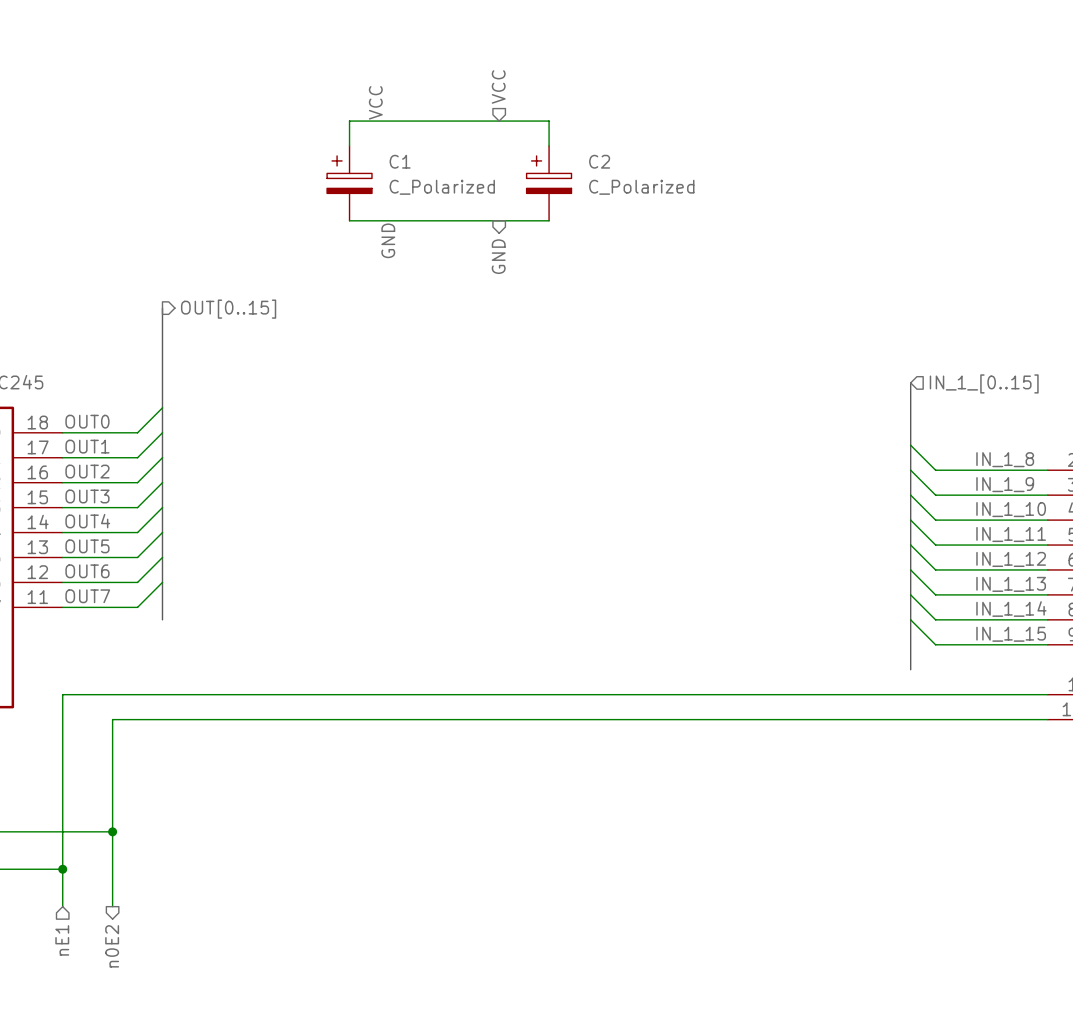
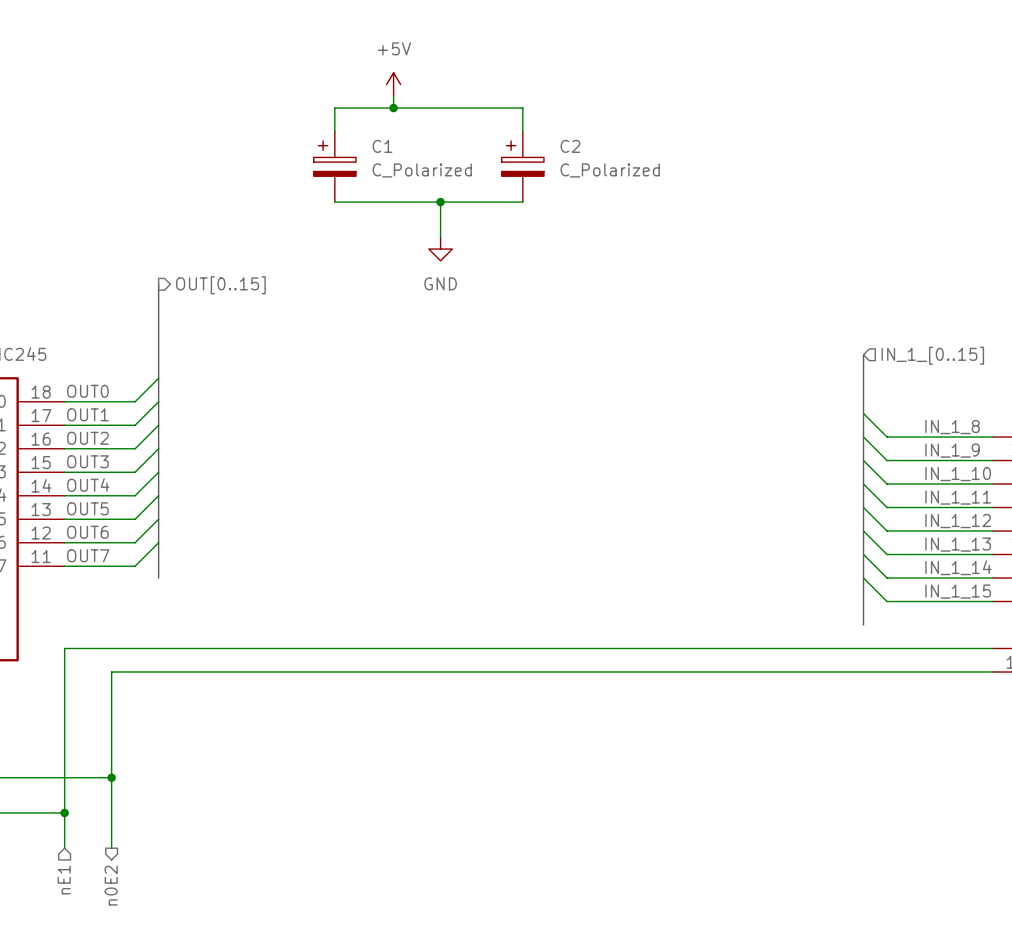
hierarchical label: VCC (498, 87) -> none
power symbol: none -> +5V (393, 84)
label: VCC (375, 102) -> none
wire: none -> (393, 96) (393, 108)
junction: none -> (393, 108)
wire: none -> (440, 202) (440, 237)
junction: none -> (440, 202)
label: GND (388, 240) -> none
hierarchical label: GND (498, 256) -> none
power symbol: none -> GND (440, 249)

